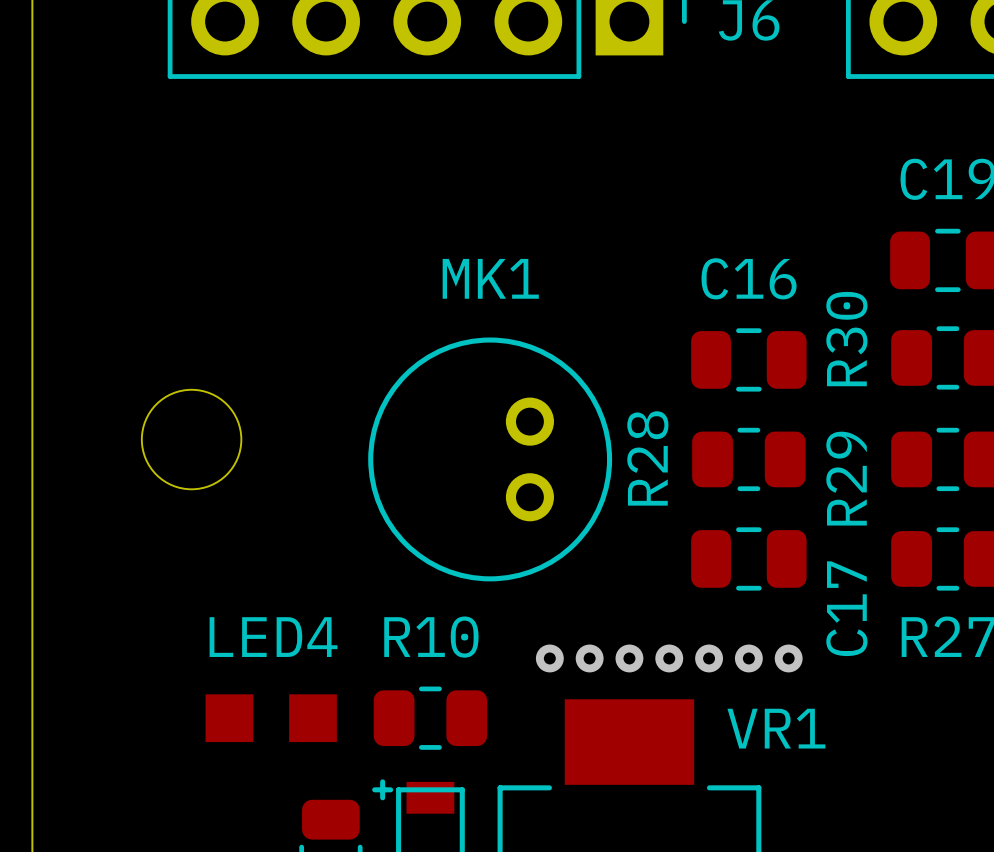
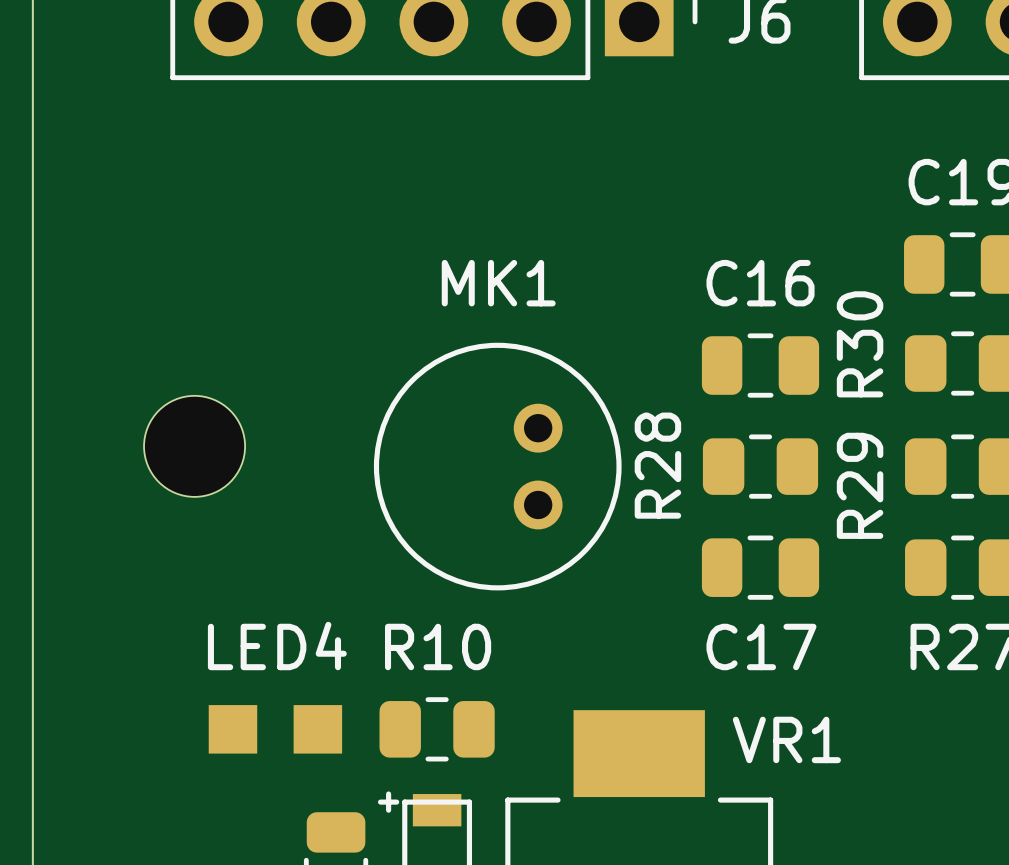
C17 name rotation: 0° (846, 608) -> 90° clockwise (761, 646)
via: (549, 658) -> none
via: (589, 658) -> none
via: (629, 658) -> none
via: (669, 658) -> none
via: (709, 658) -> none
via: (748, 658) -> none
via: (788, 658) -> none

